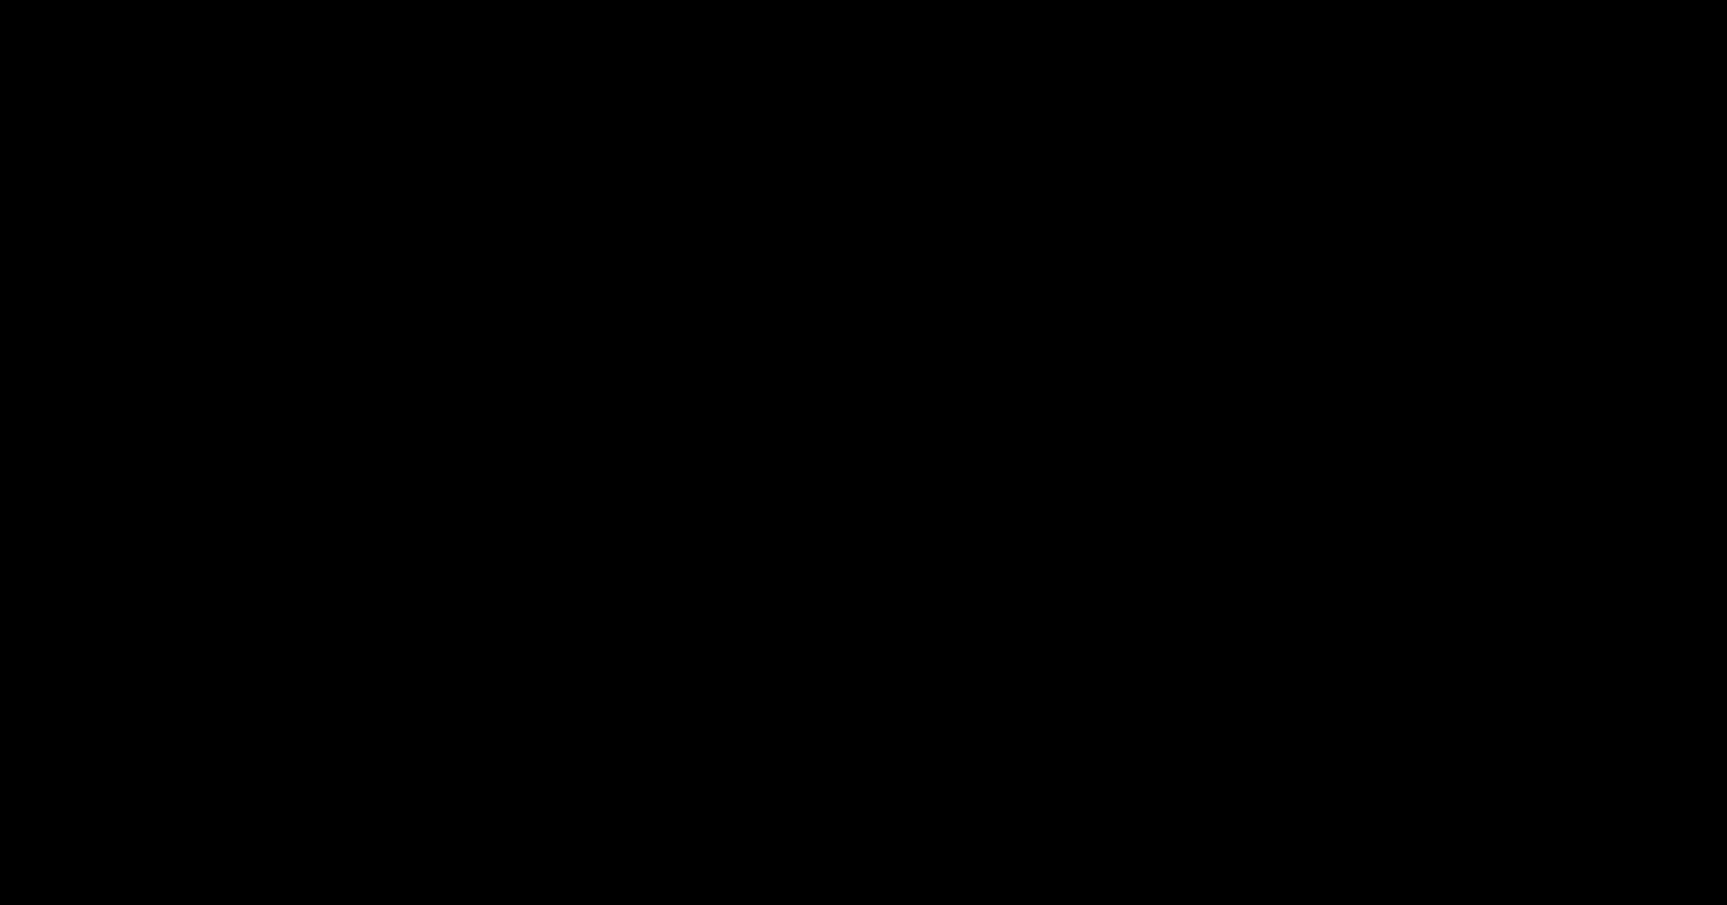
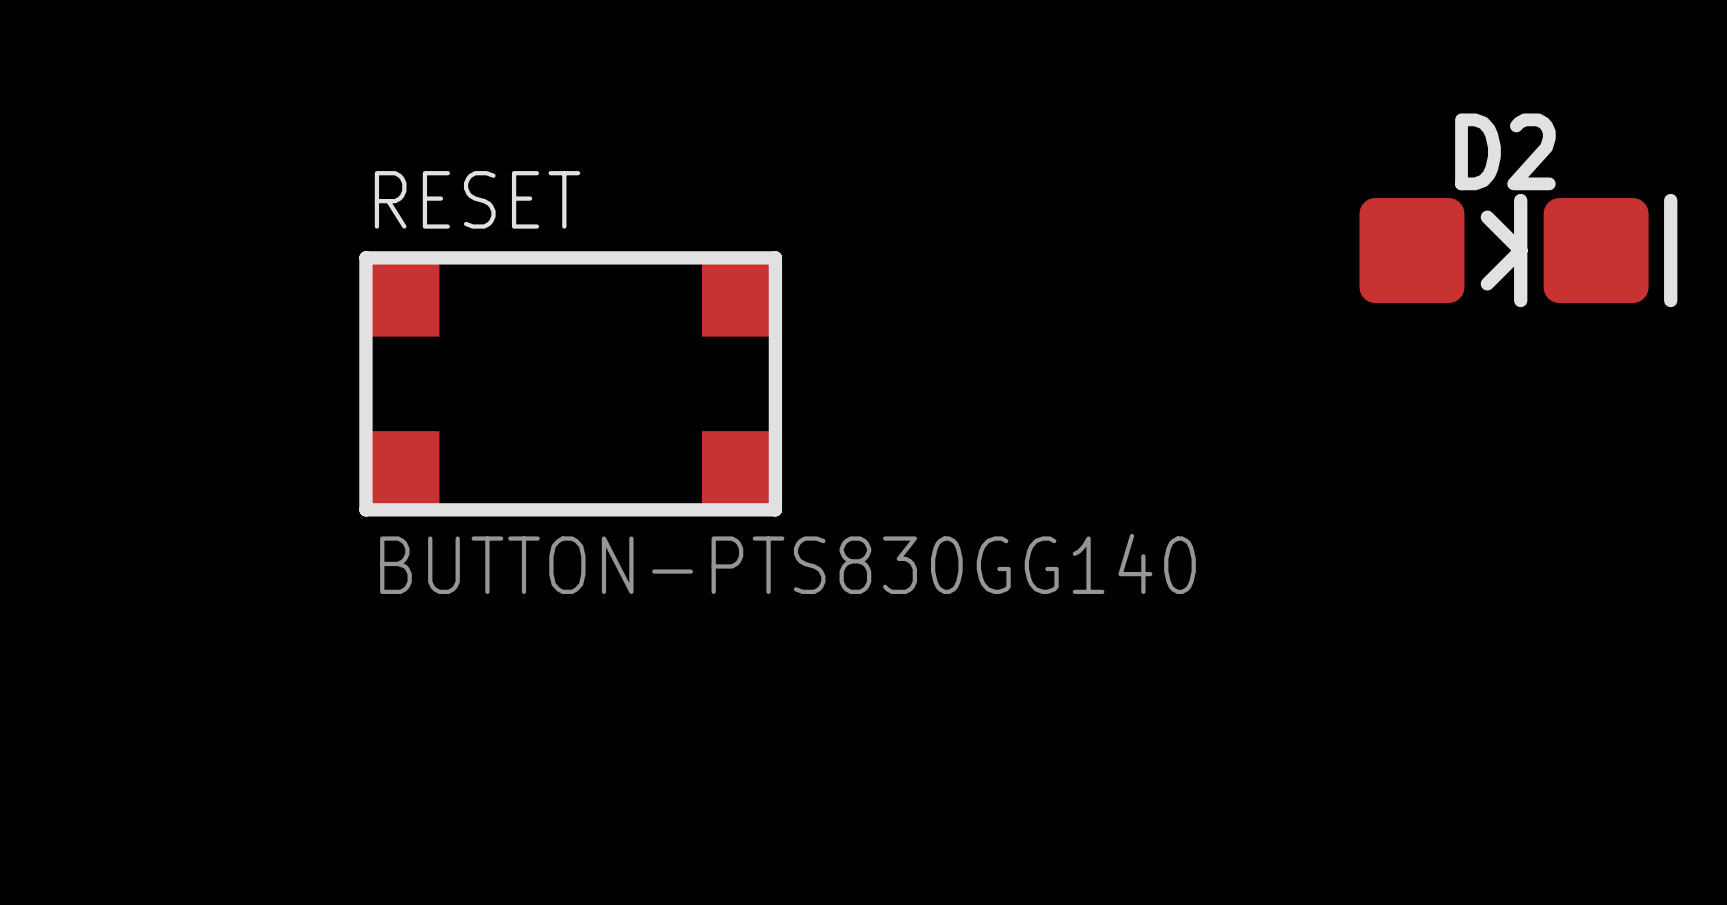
D2: none -> (1518, 250)
RESET: none -> BUTTON-PTS830GG140 (570, 383)

